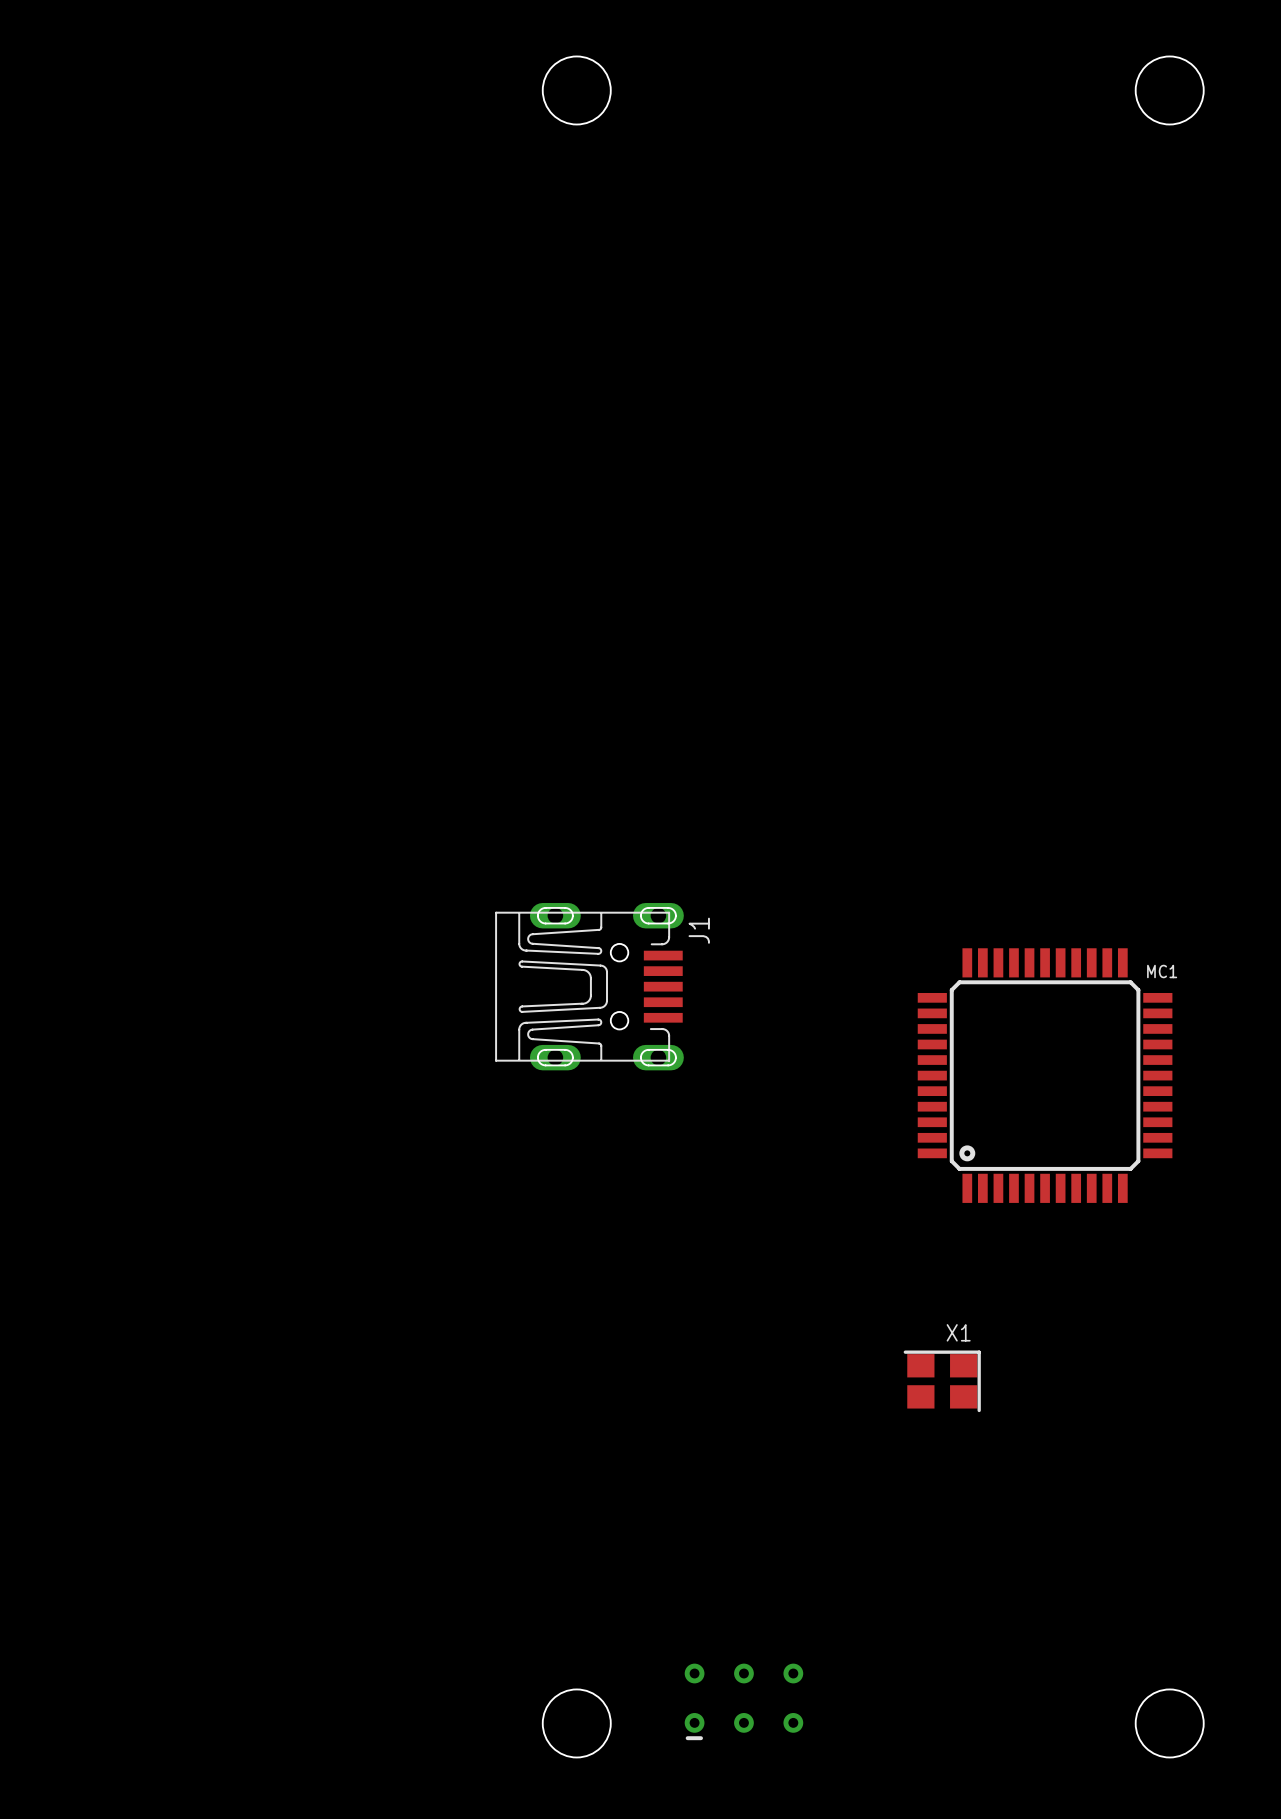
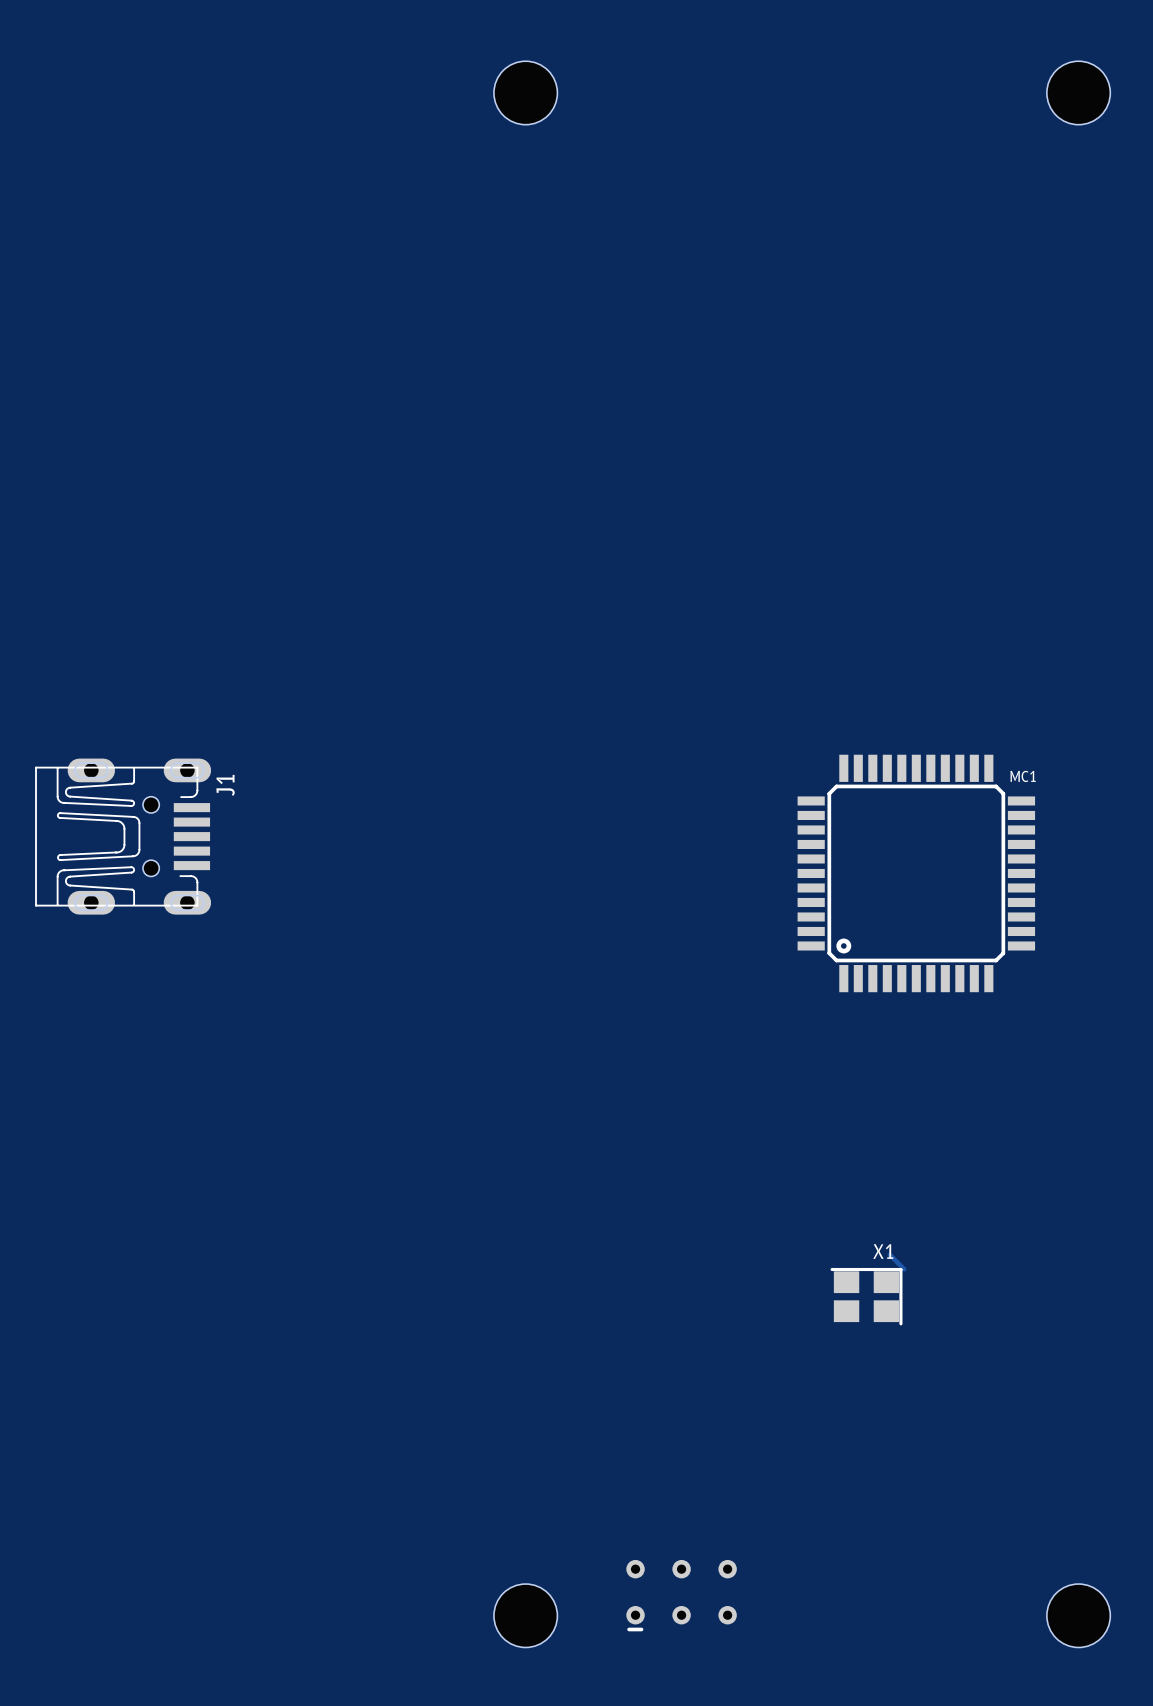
J1 position: (589, 986) -> (123, 836)
MC1 position: (1045, 1075) -> (916, 873)
track: none -> (889, 1254) (904, 1269)

